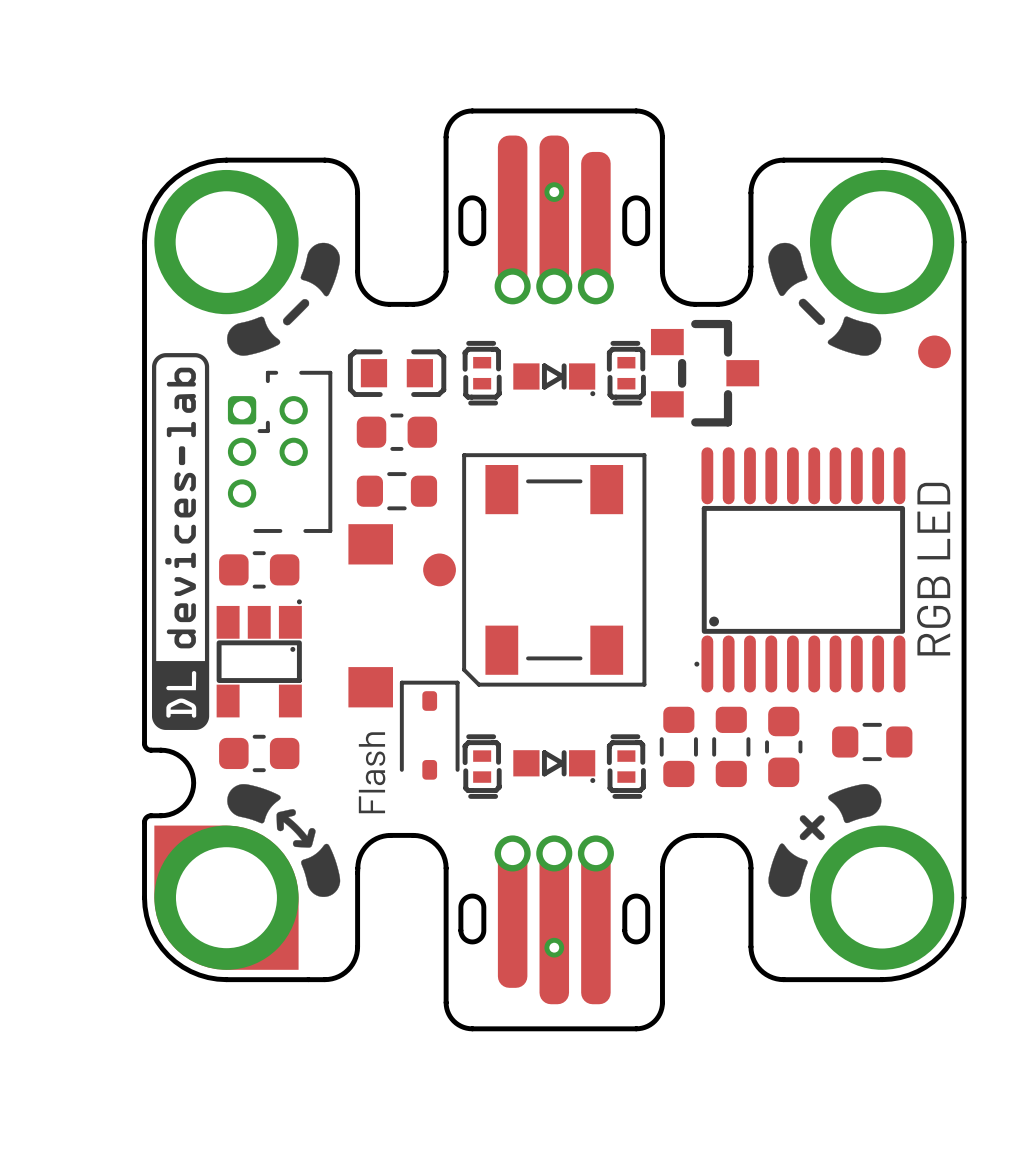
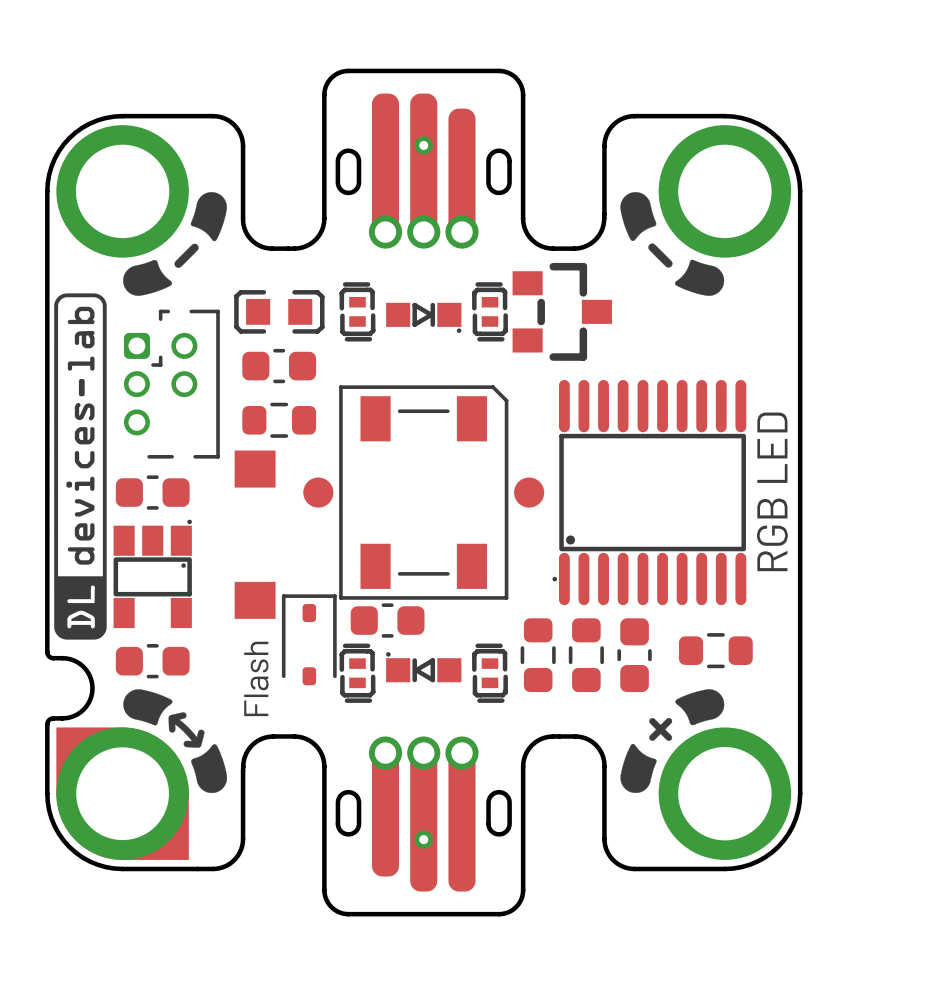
part position: (934, 351) -> (529, 492)
part rotation: 0° (554, 569) -> 180° (423, 492)
part: none -> (387, 620)
part rotation: 0° (554, 766) -> 180° (423, 667)

